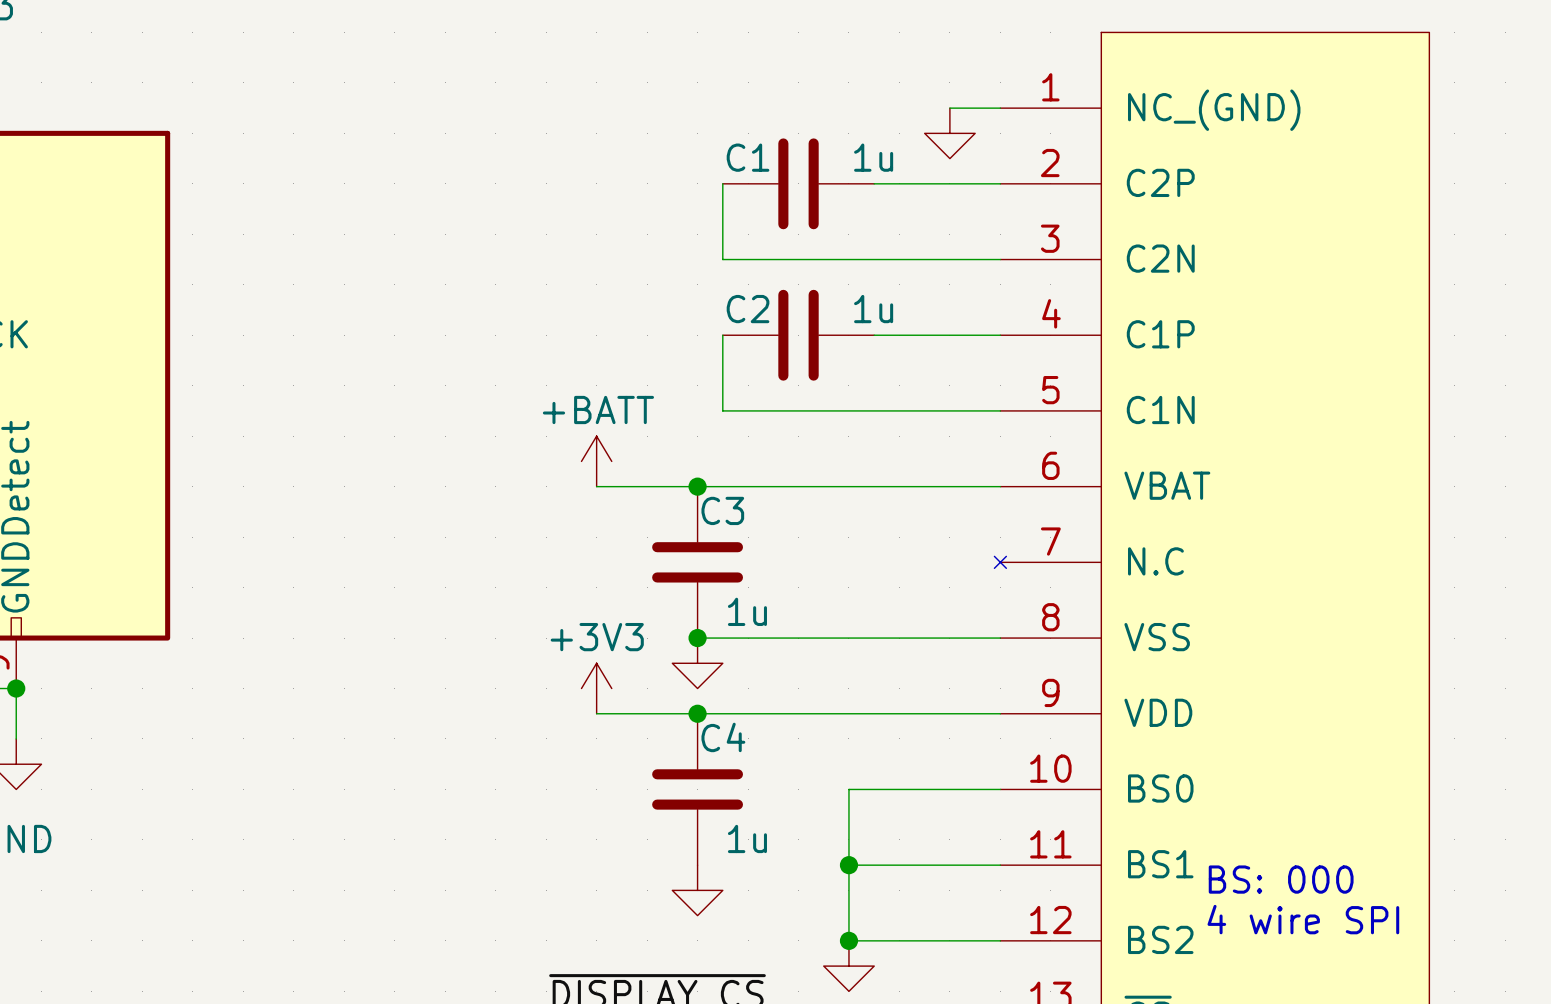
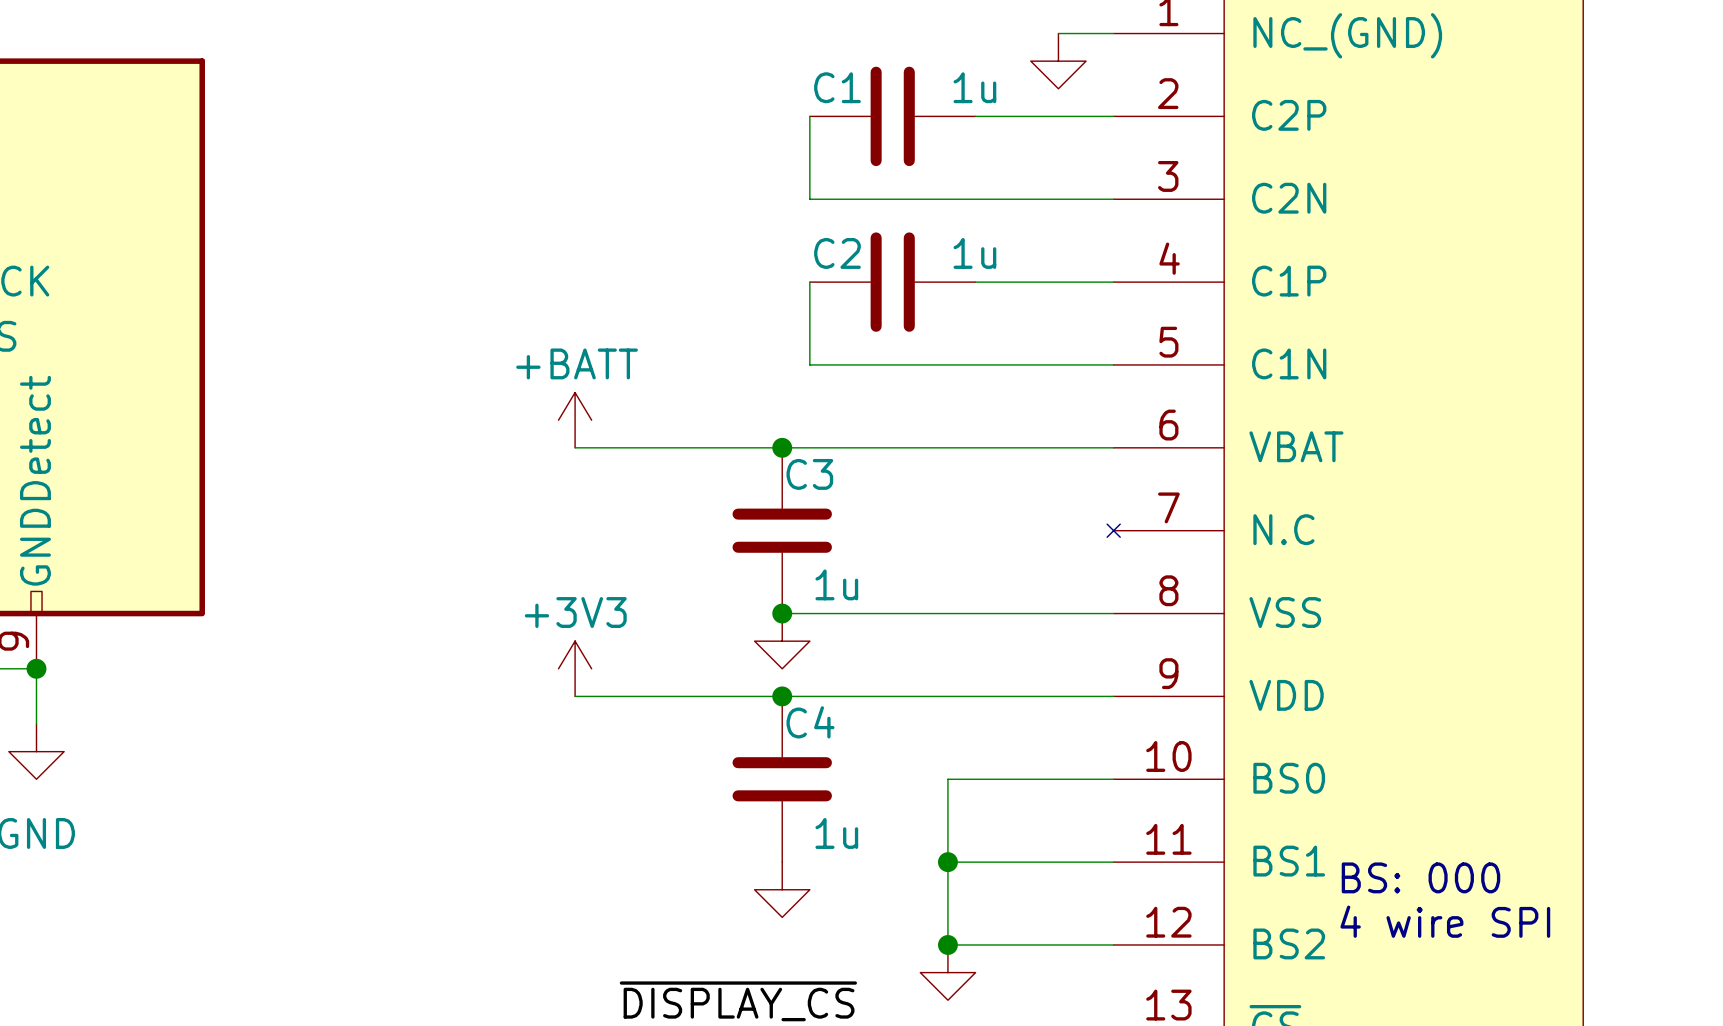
power symbol position: +BATT (596, 461) -> +BATT (575, 420)
wire: none -> (575, 447) (671, 447)
power symbol position: +3V3 (596, 688) -> +3V3 (575, 668)
wire: none -> (575, 696) (671, 696)

